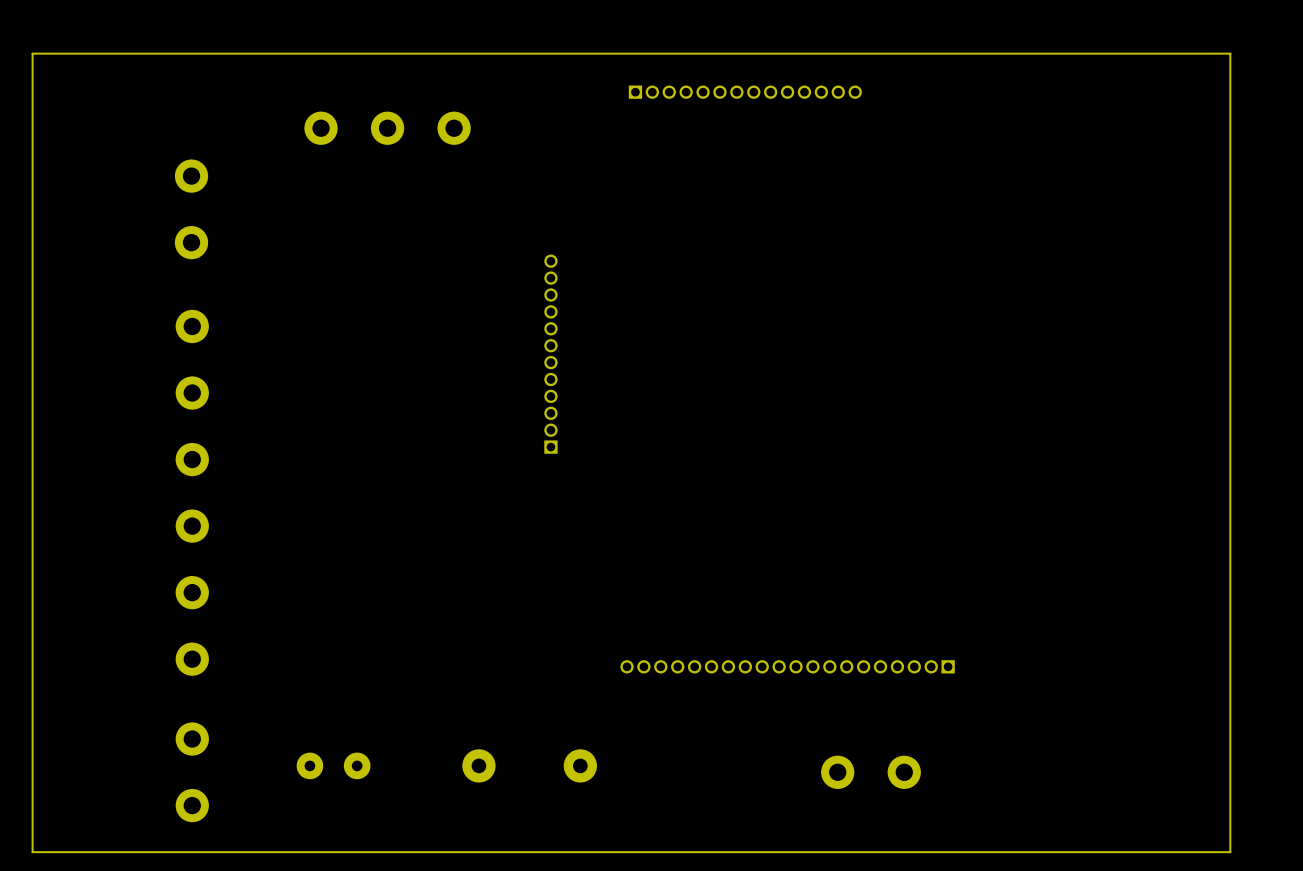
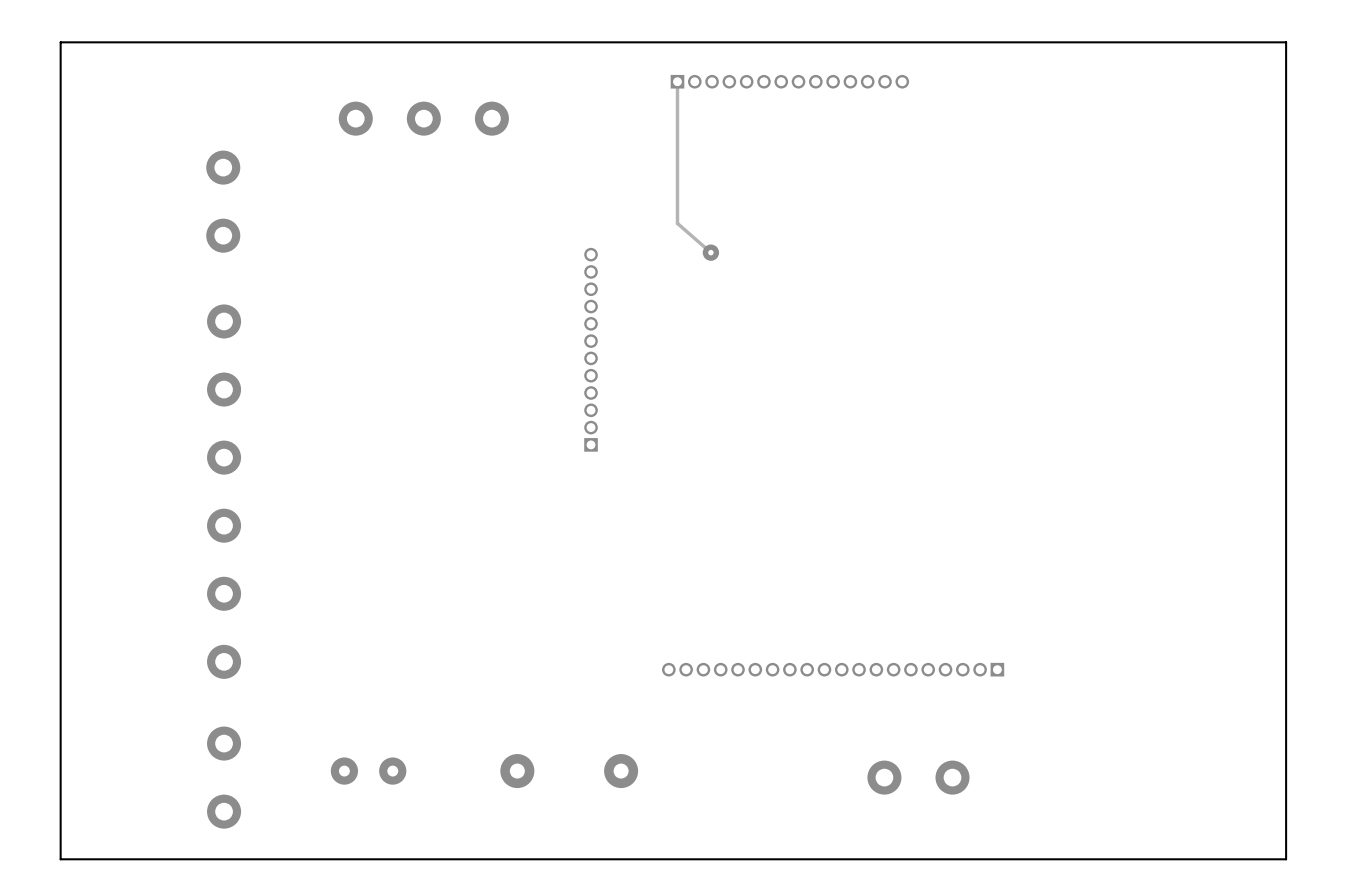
track: none -> (677, 81) (677, 223) (710, 252)
via: none -> (710, 252)

